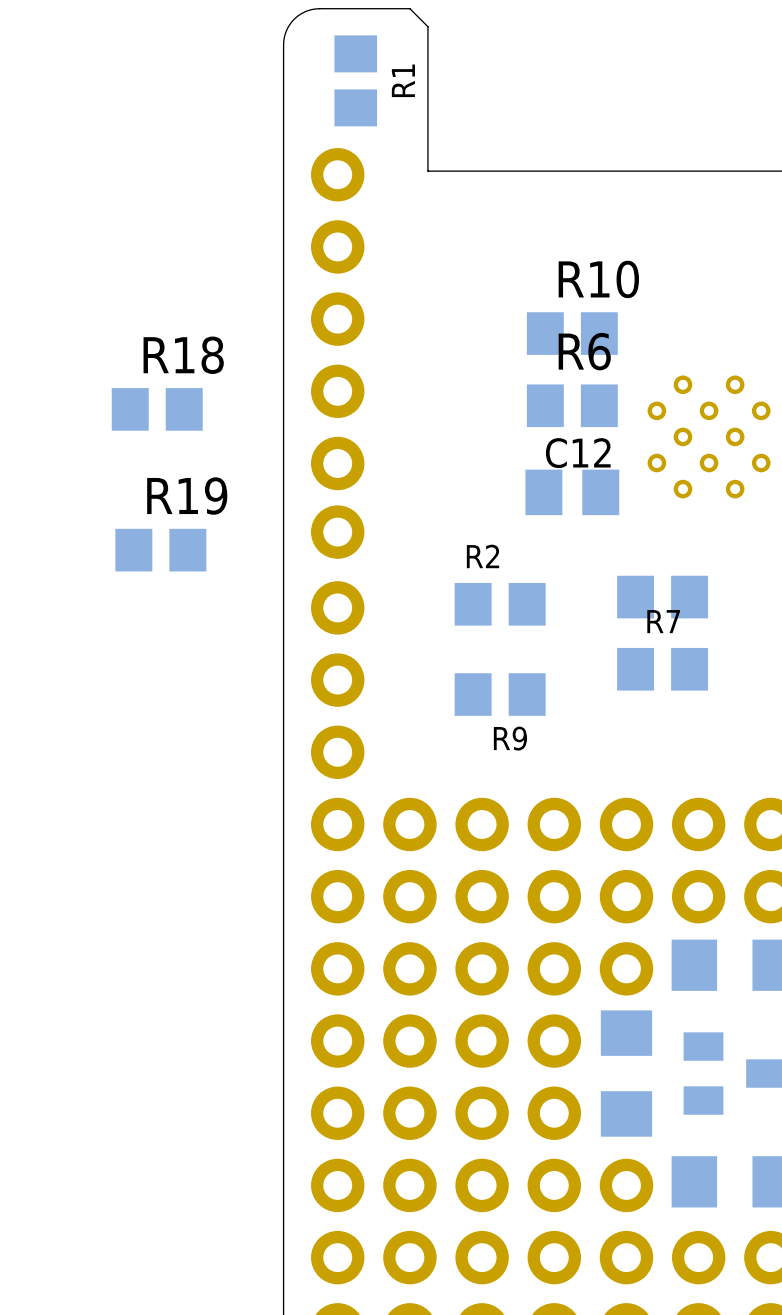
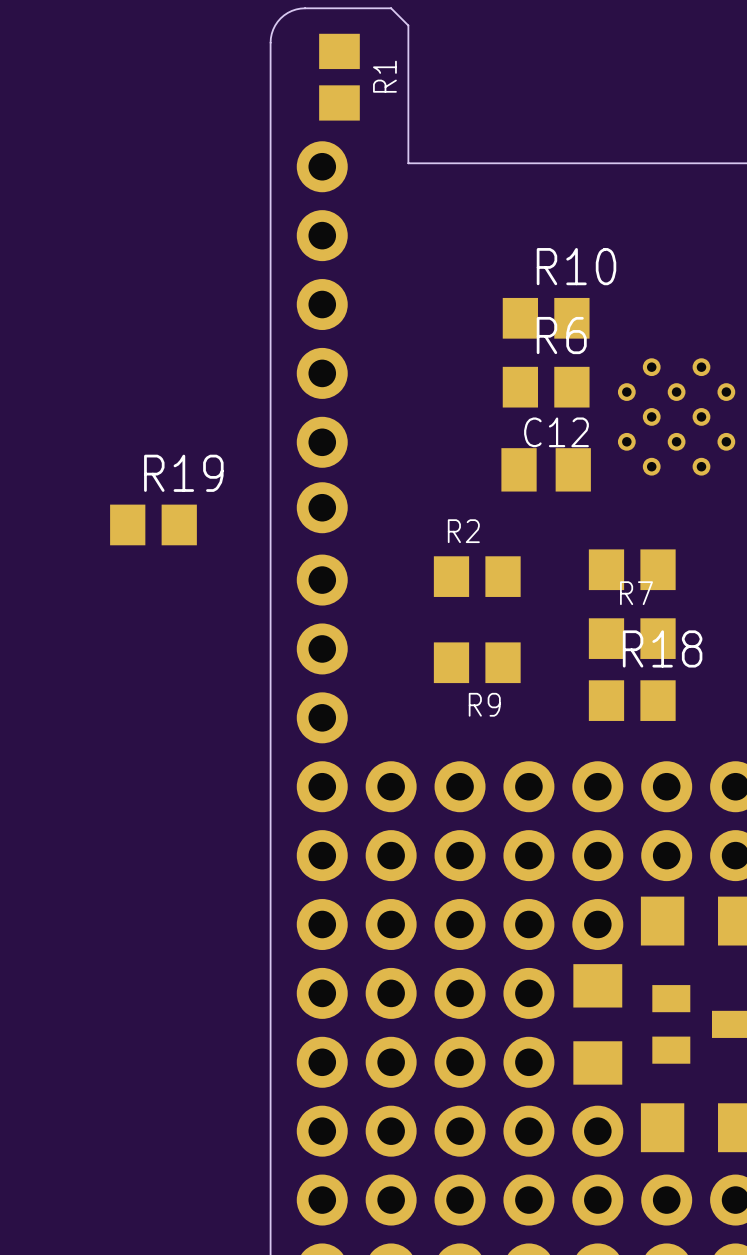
R18 position: (157, 409) -> (632, 700)

